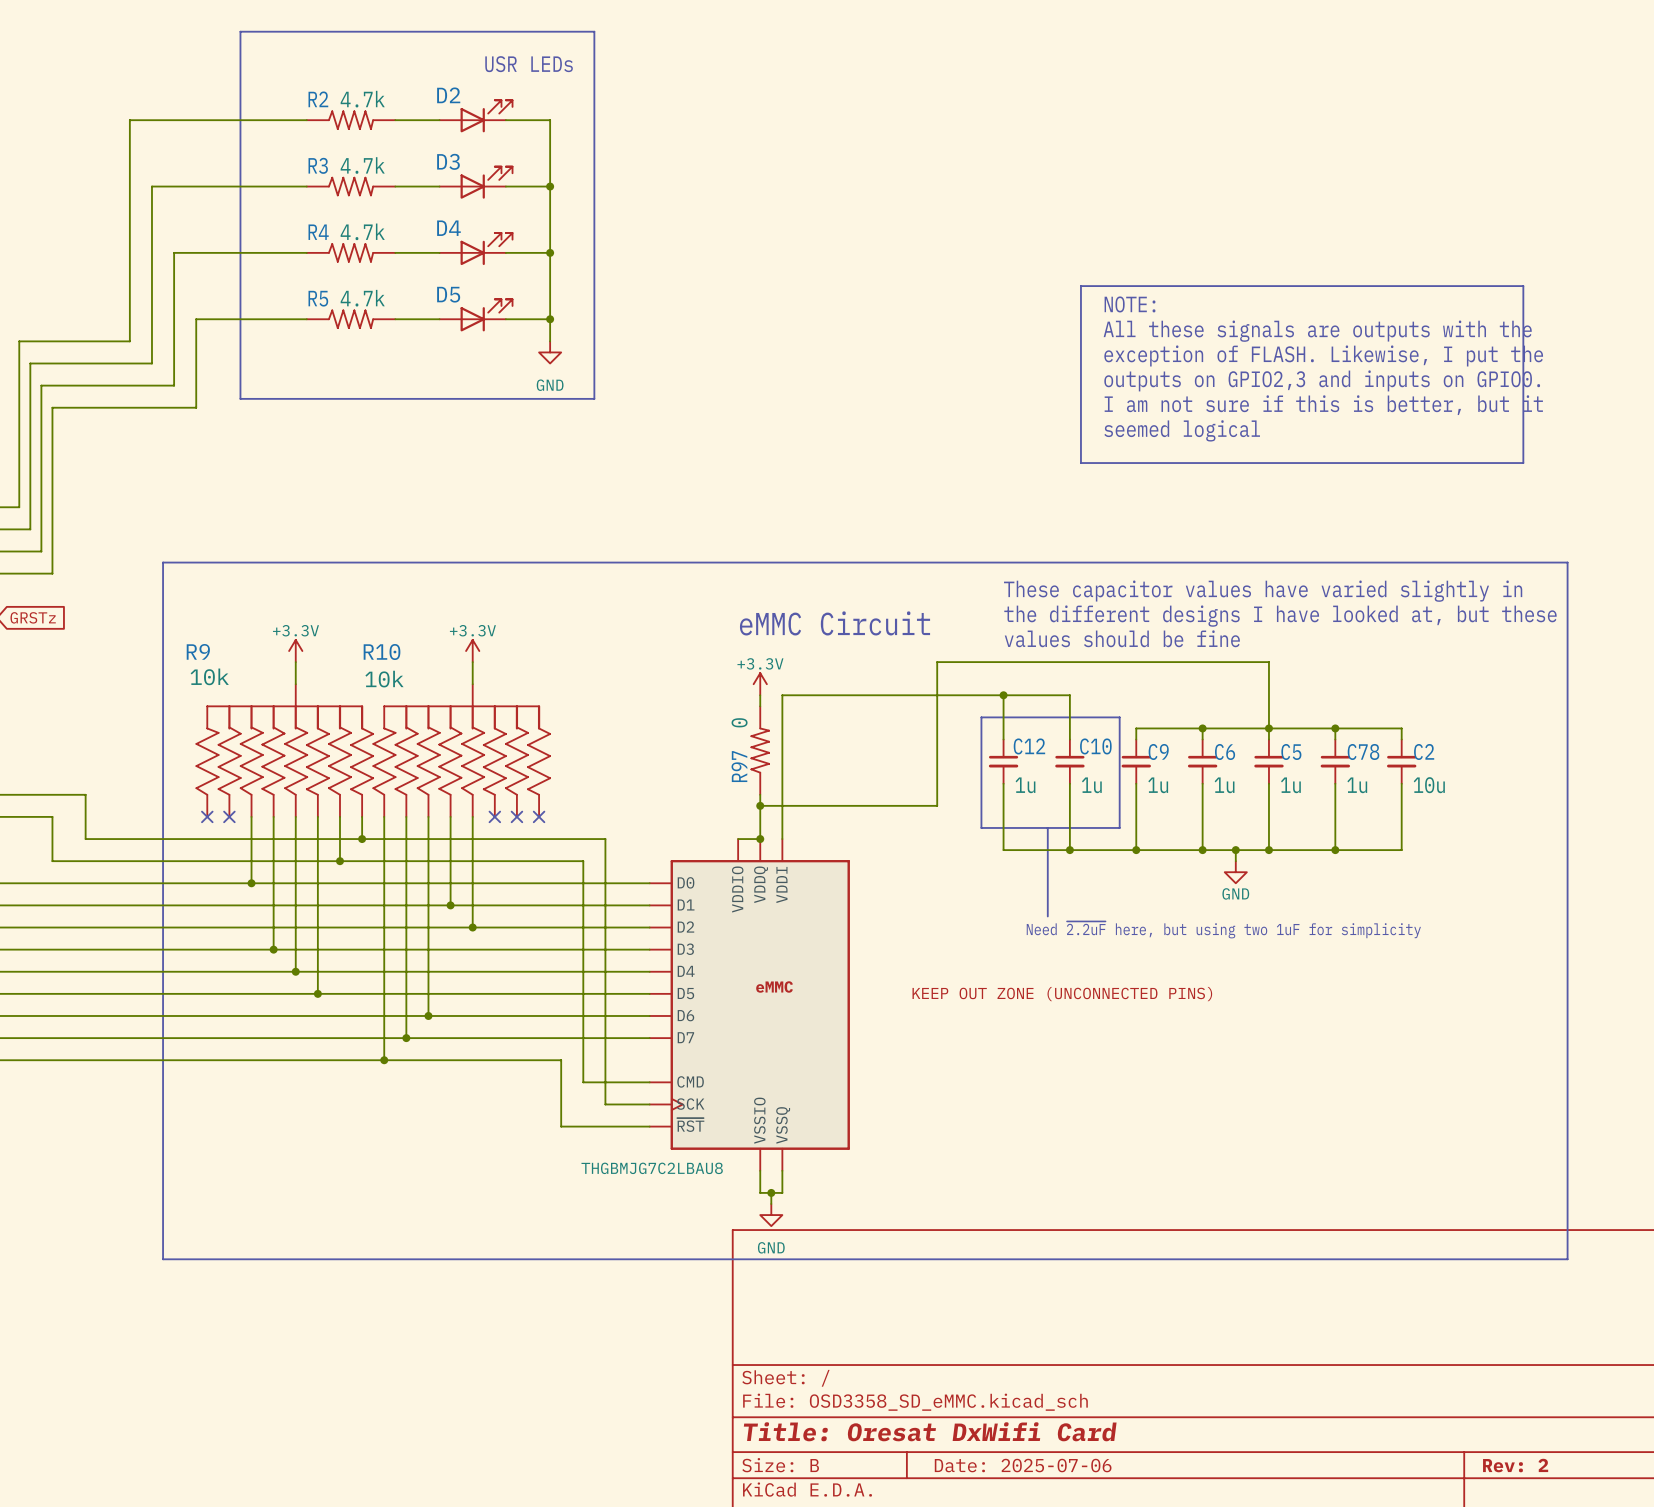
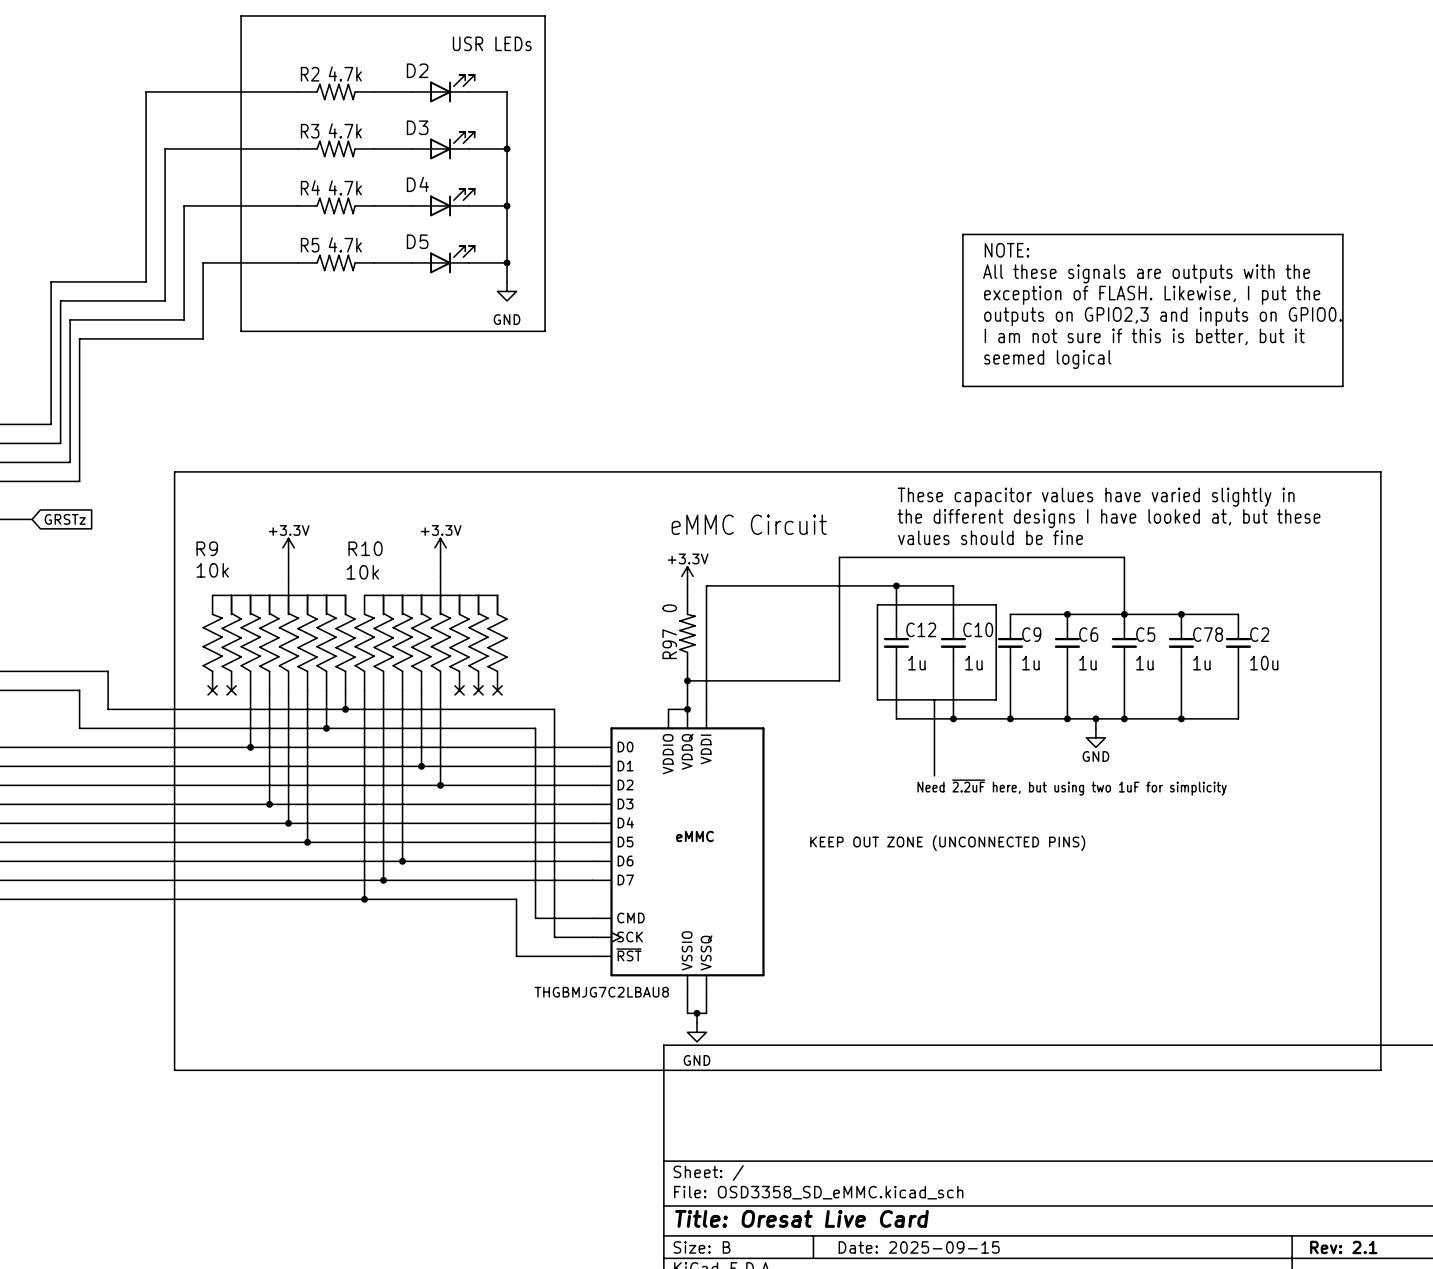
title block: Title: Oresat DxWifi Card (930, 1431) -> Title: Oresat Live Card (801, 1218)
title block: Date: 2025-07-06 (1023, 1465) -> Date: 2025-09-15 (919, 1247)
title block: Rev: 2 (1515, 1465) -> Rev: 2.1 (1343, 1247)

